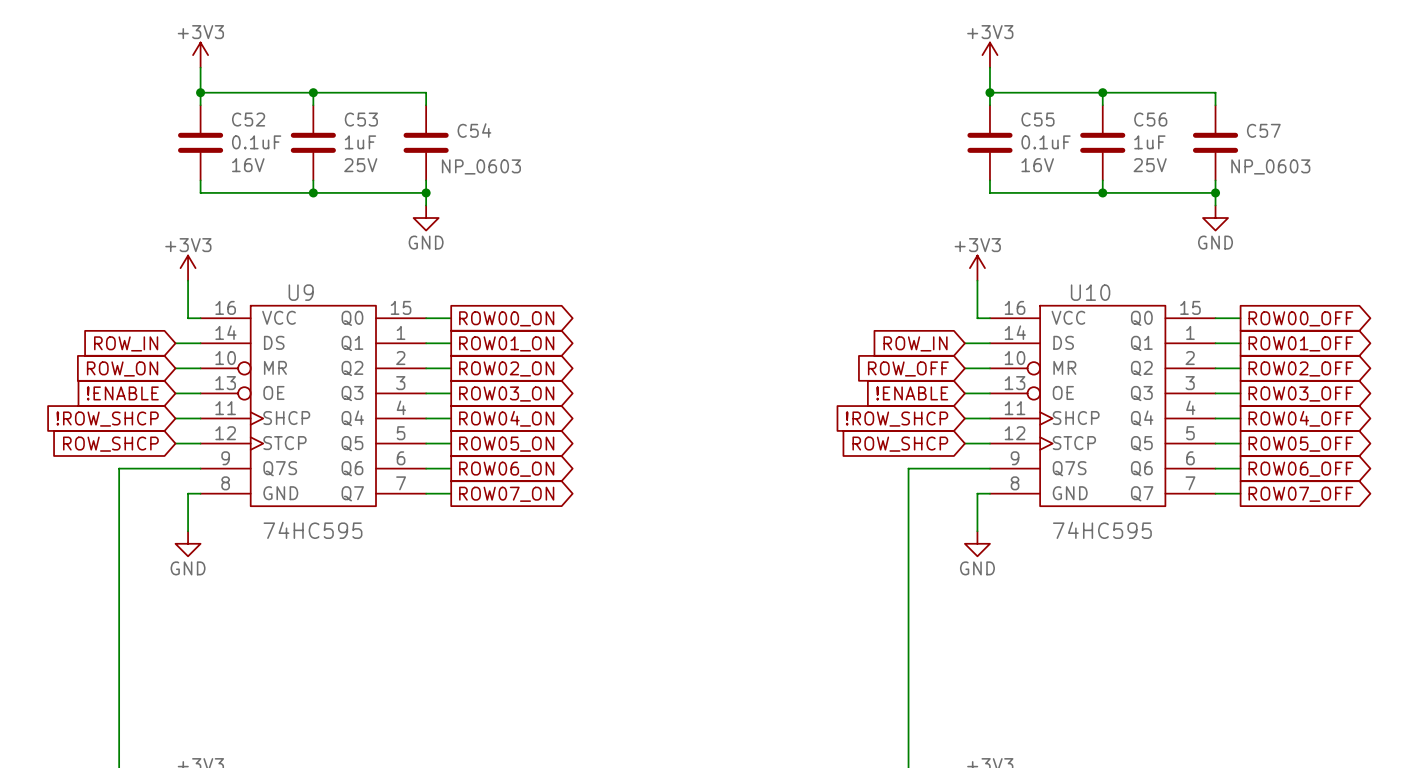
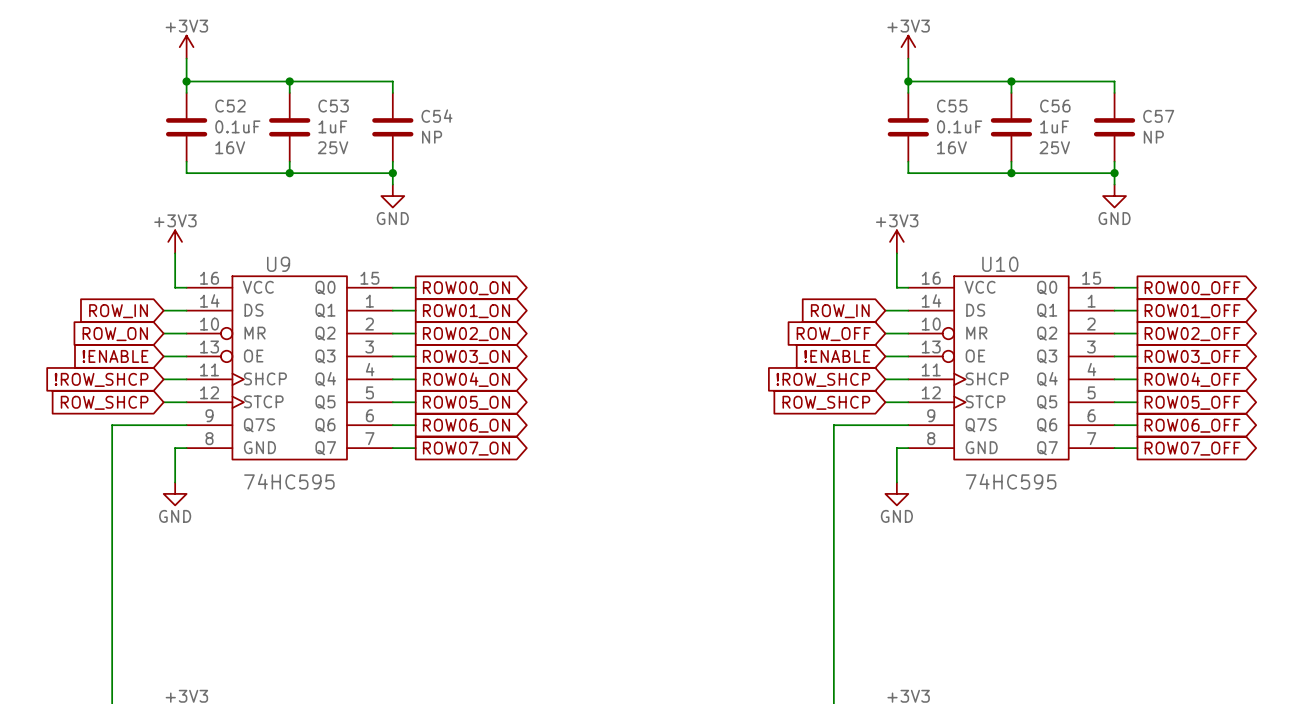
C54 text: none -> NP (432, 137)
C57 text: none -> NP (1153, 137)
C54 value: NP_0603 (481, 166) -> none
C57 value: NP_0603 (1270, 166) -> none

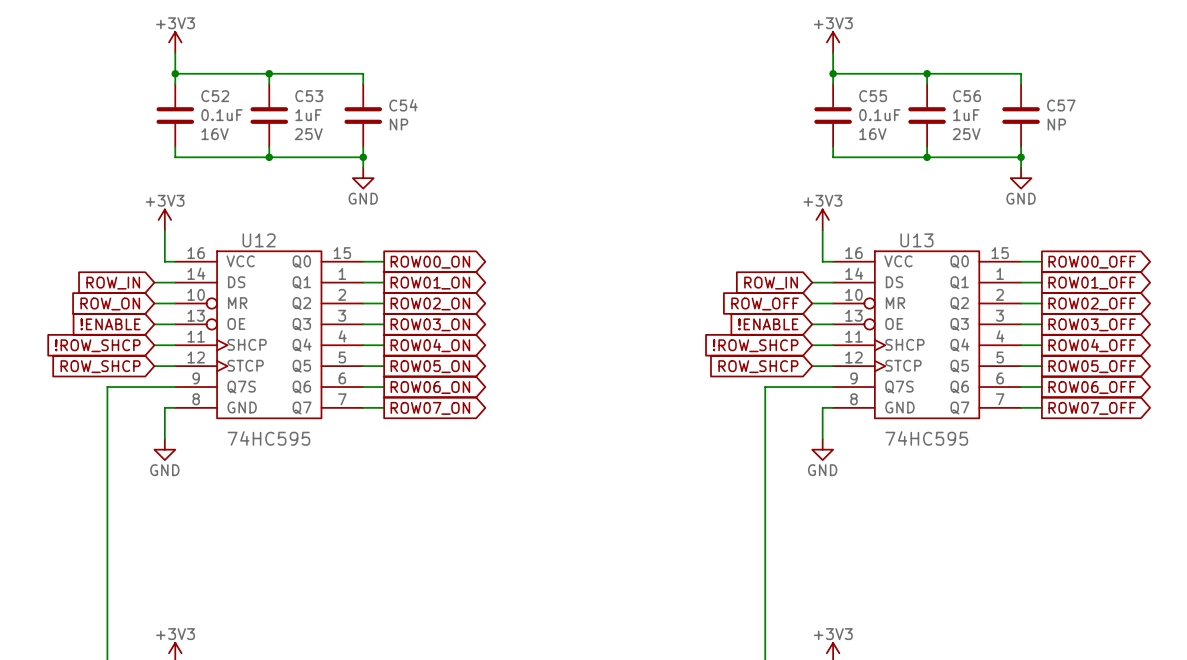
U9 name: U9 (278, 264) -> U12 (259, 240)
U10 name: U10 (1000, 264) -> U13 (916, 240)

